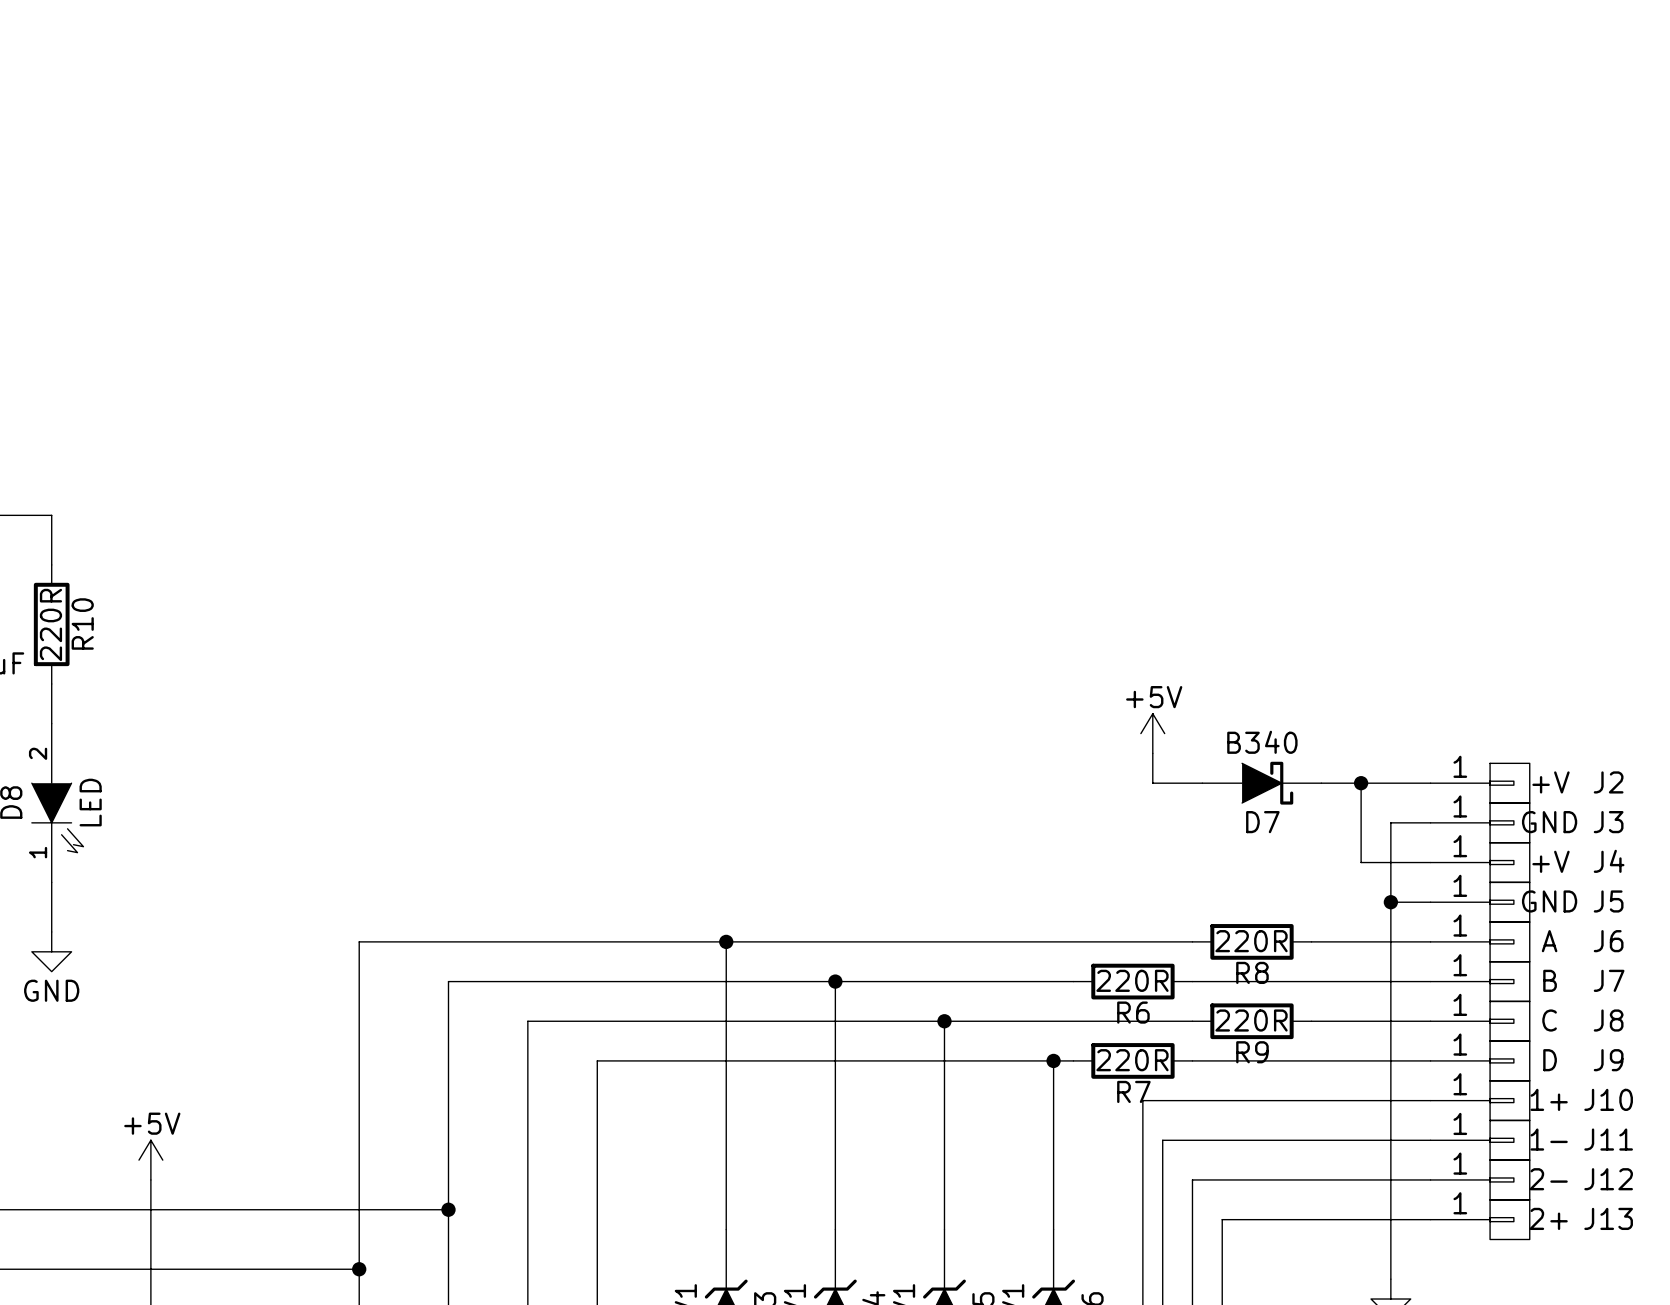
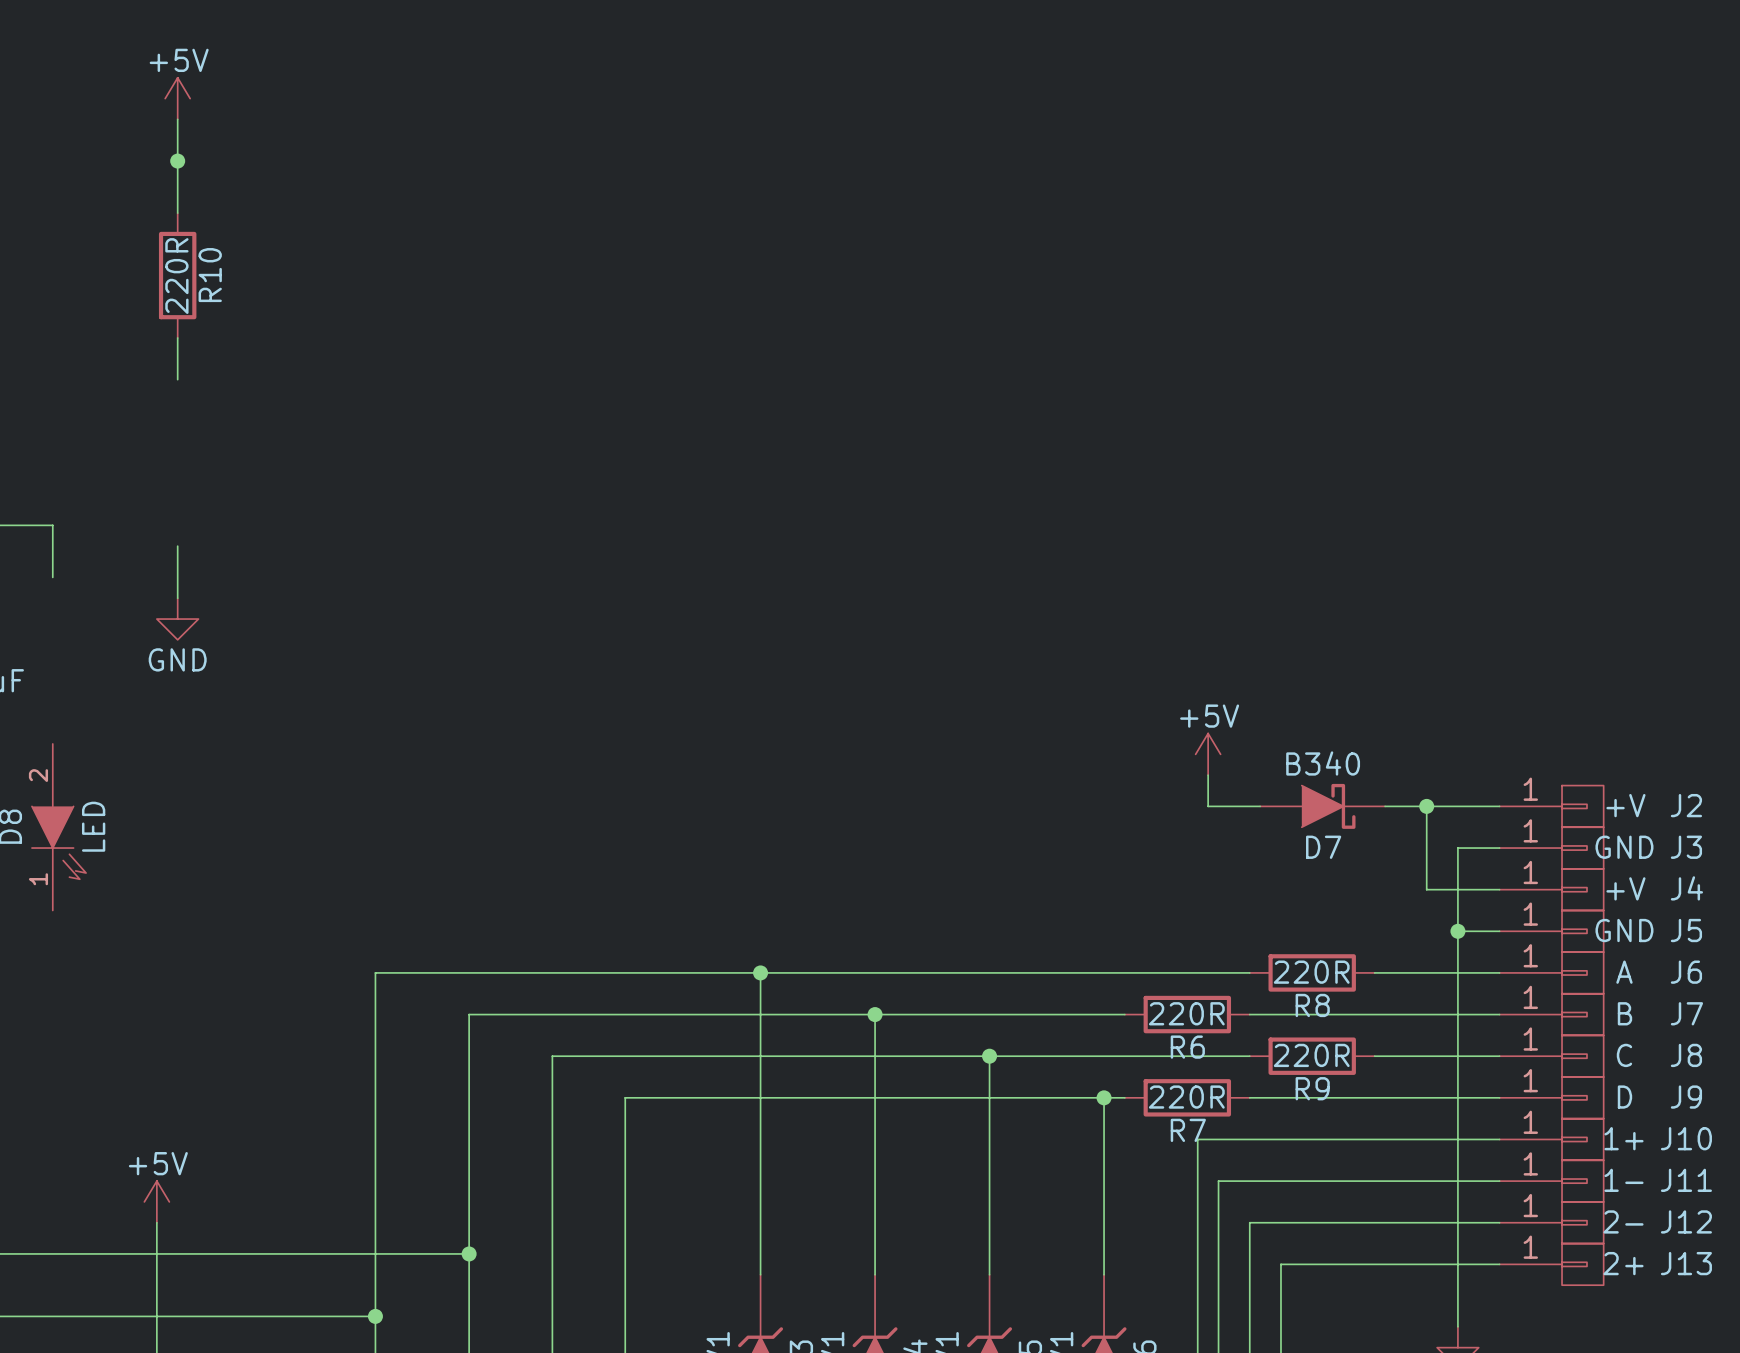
power symbol: none -> +5V (177, 98)
wire: none -> (177, 119) (177, 213)
junction: none -> (177, 161)
power symbol: none -> GND (177, 619)
R10 position: (51, 624) -> (177, 275)
wire: (51, 683) (51, 723) -> (177, 338) (177, 379)
wire: (51, 882) (51, 931) -> (177, 546) (177, 598)
power symbol: GND (51, 951) -> none

